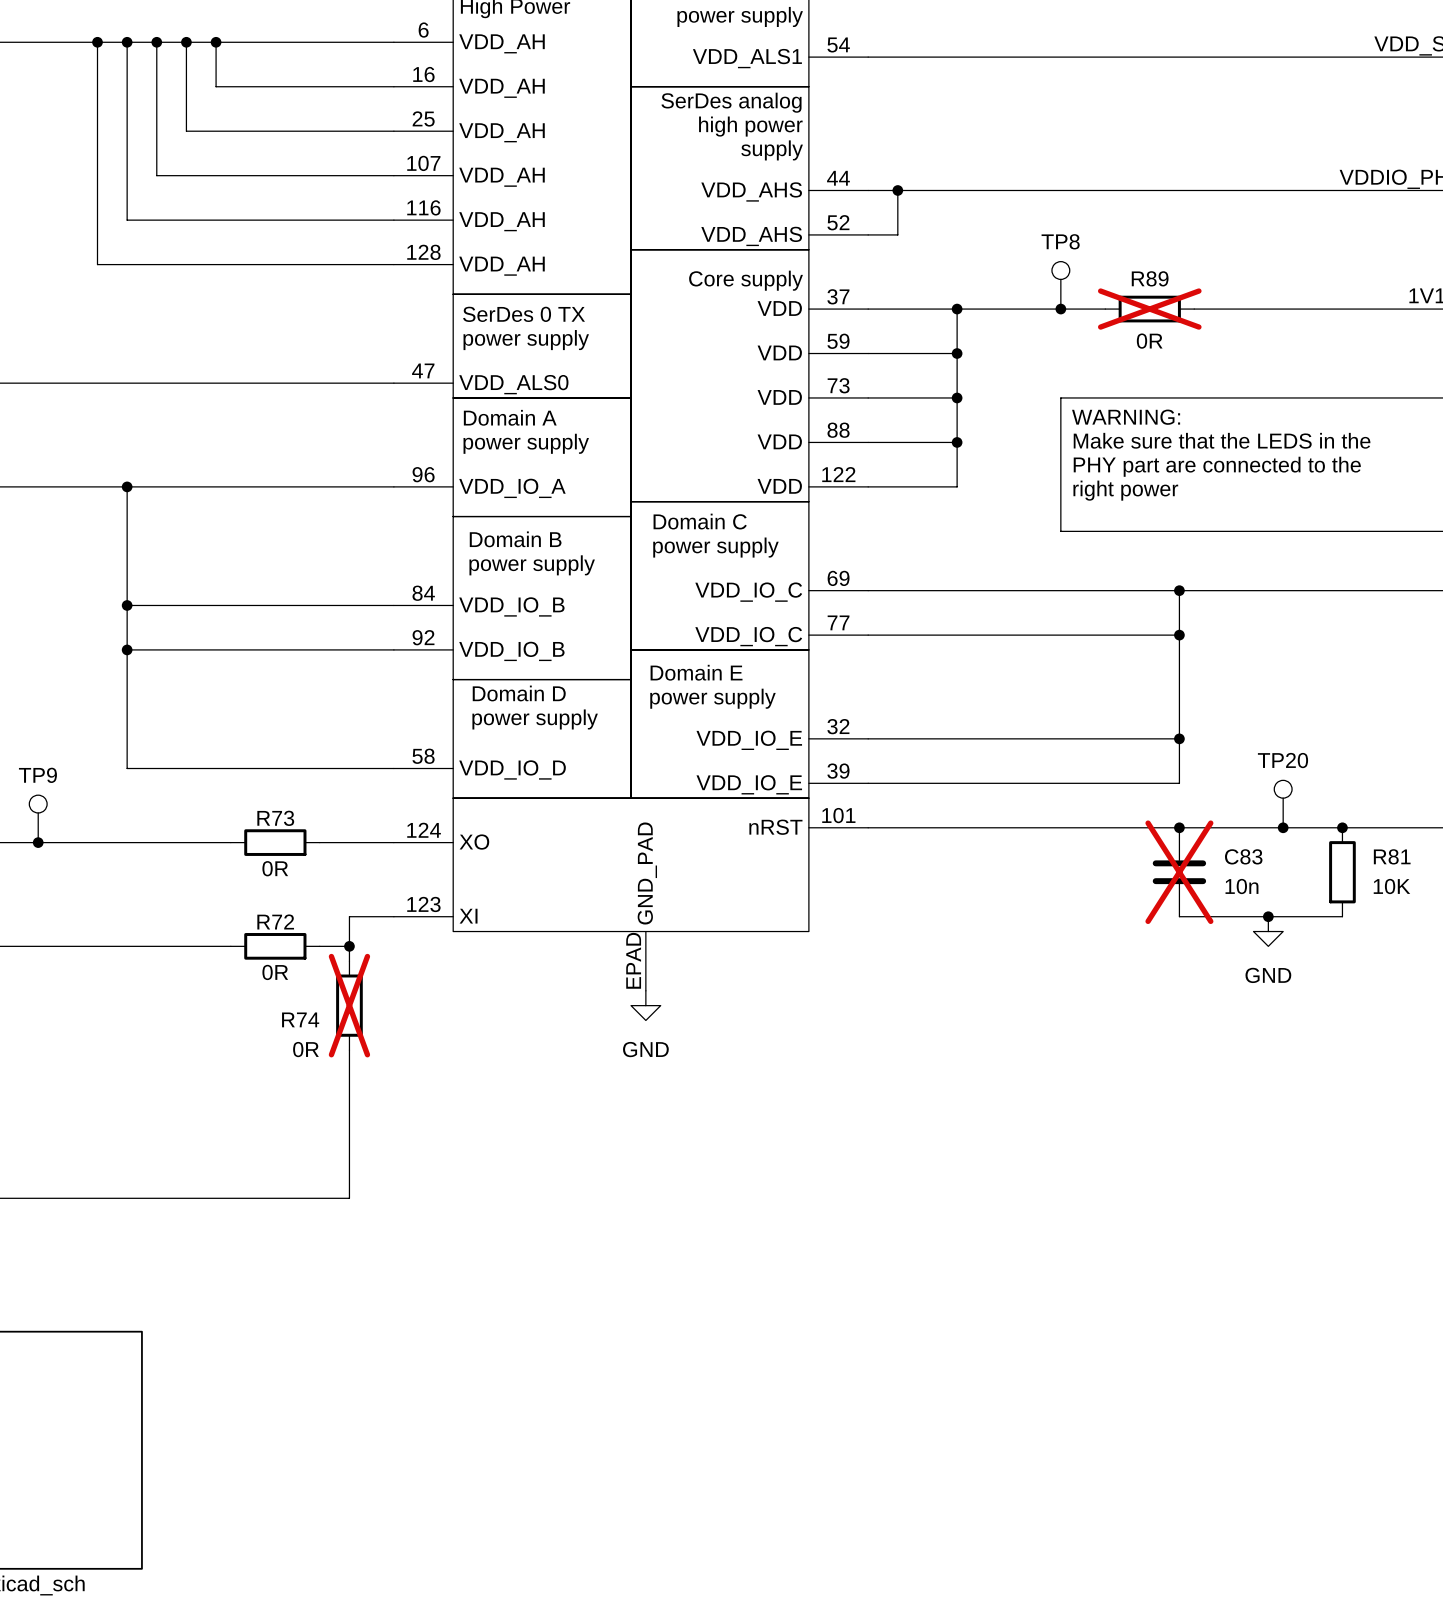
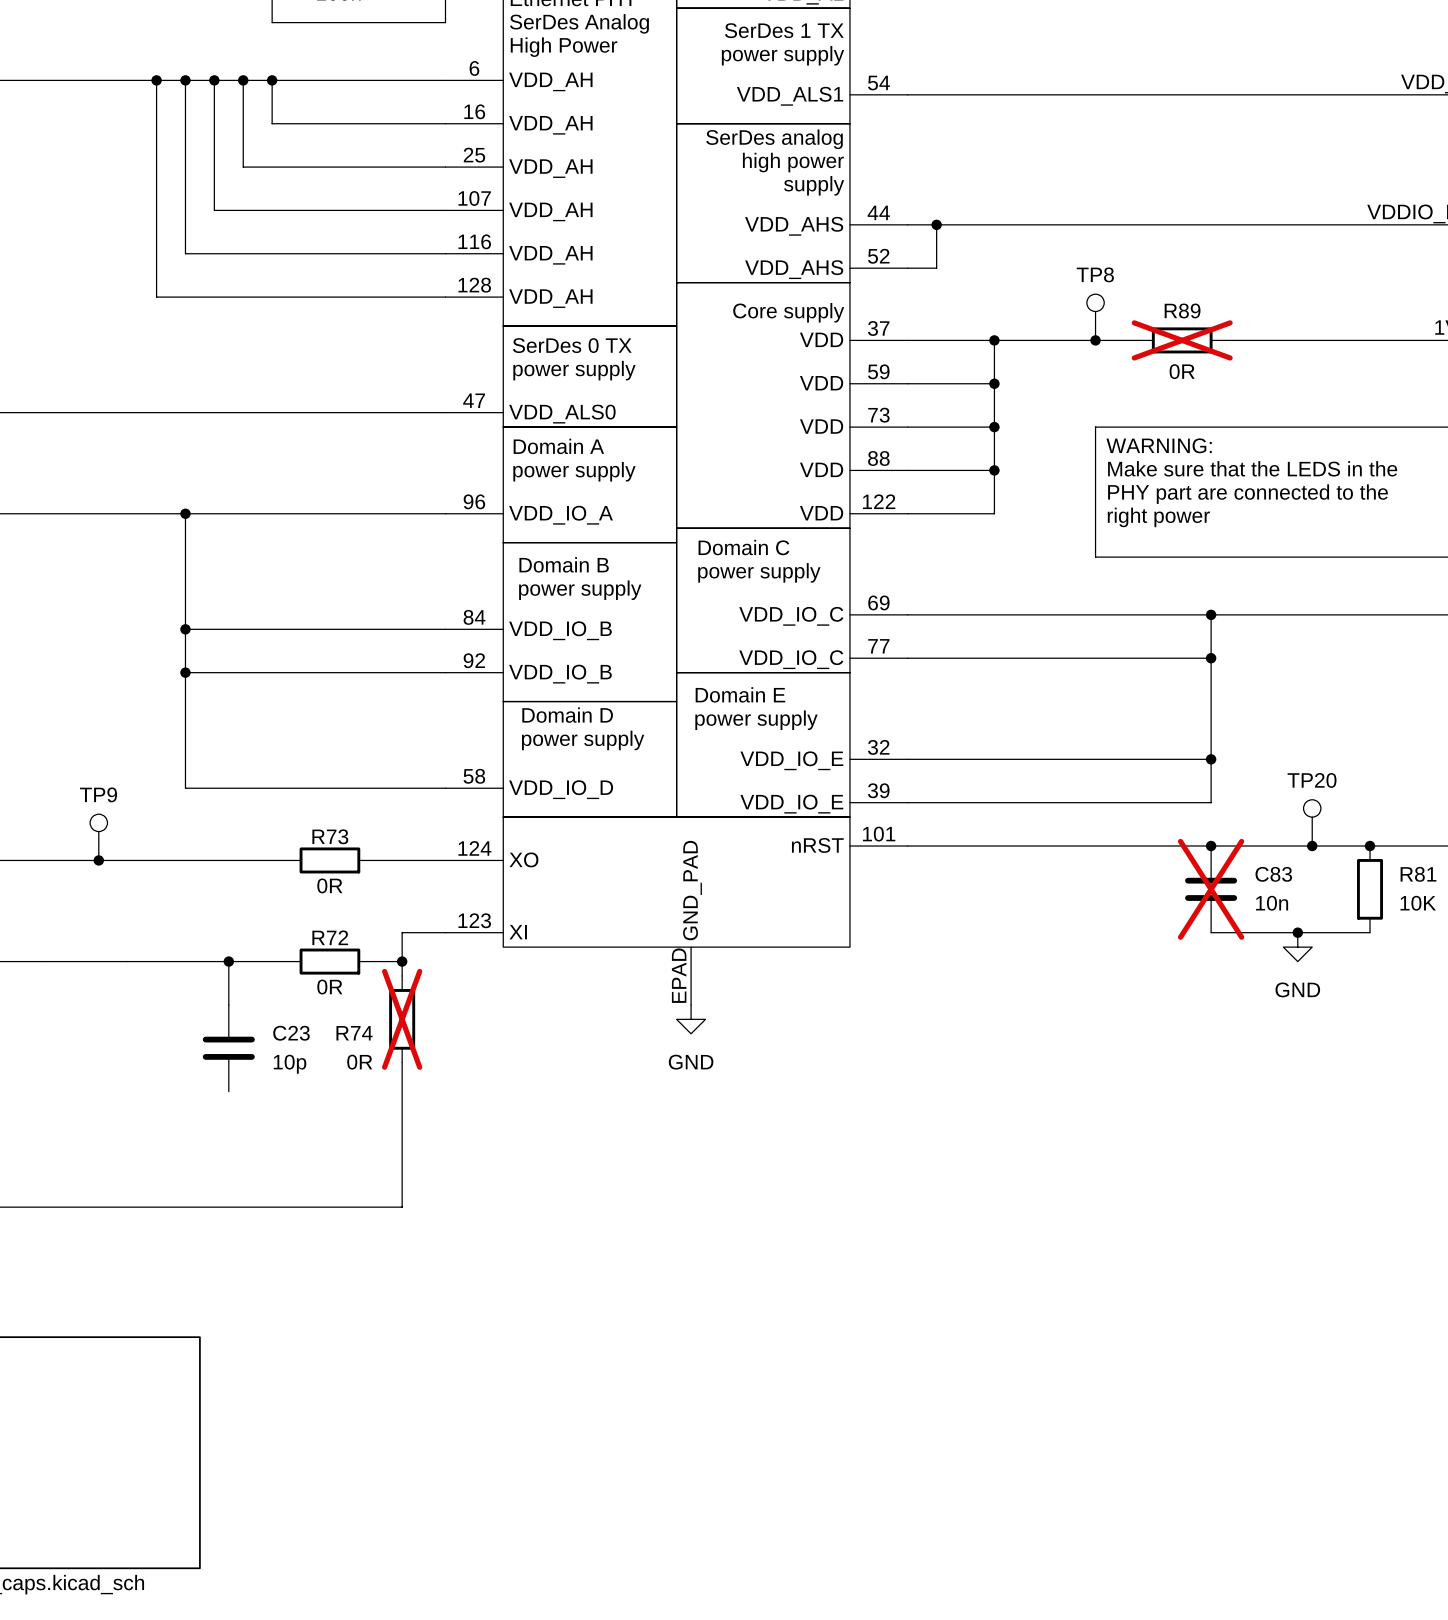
wire: none -> (228, 961) (228, 1004)
junction: none -> (228, 961)
C23: none -> 10p (228, 1048)

